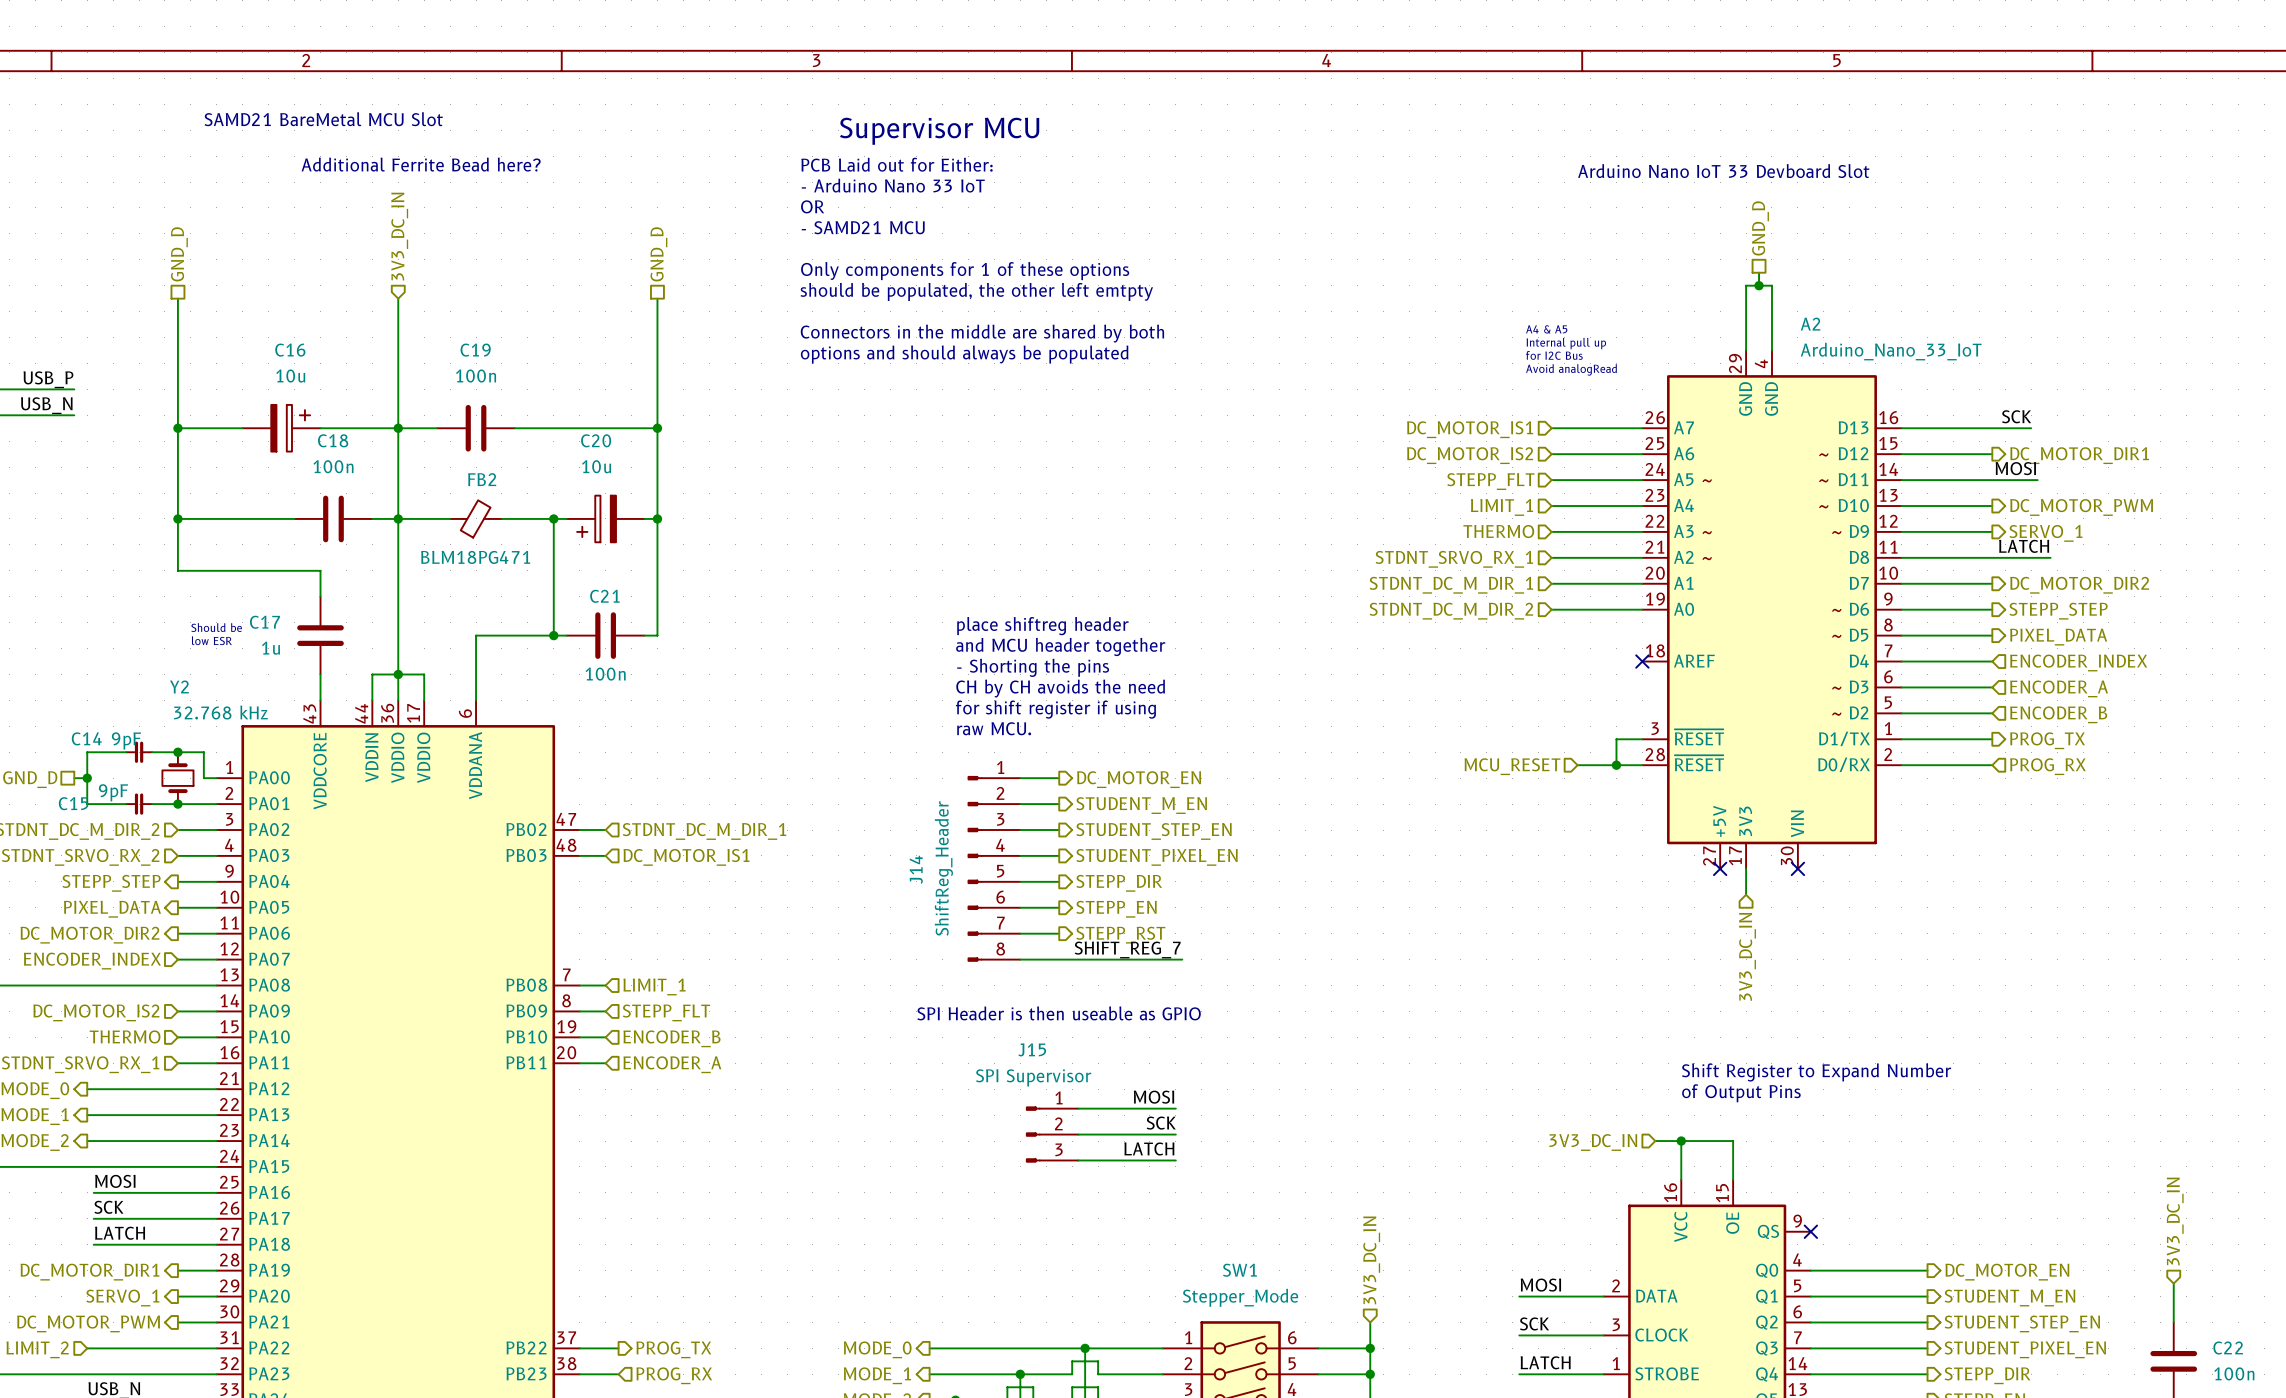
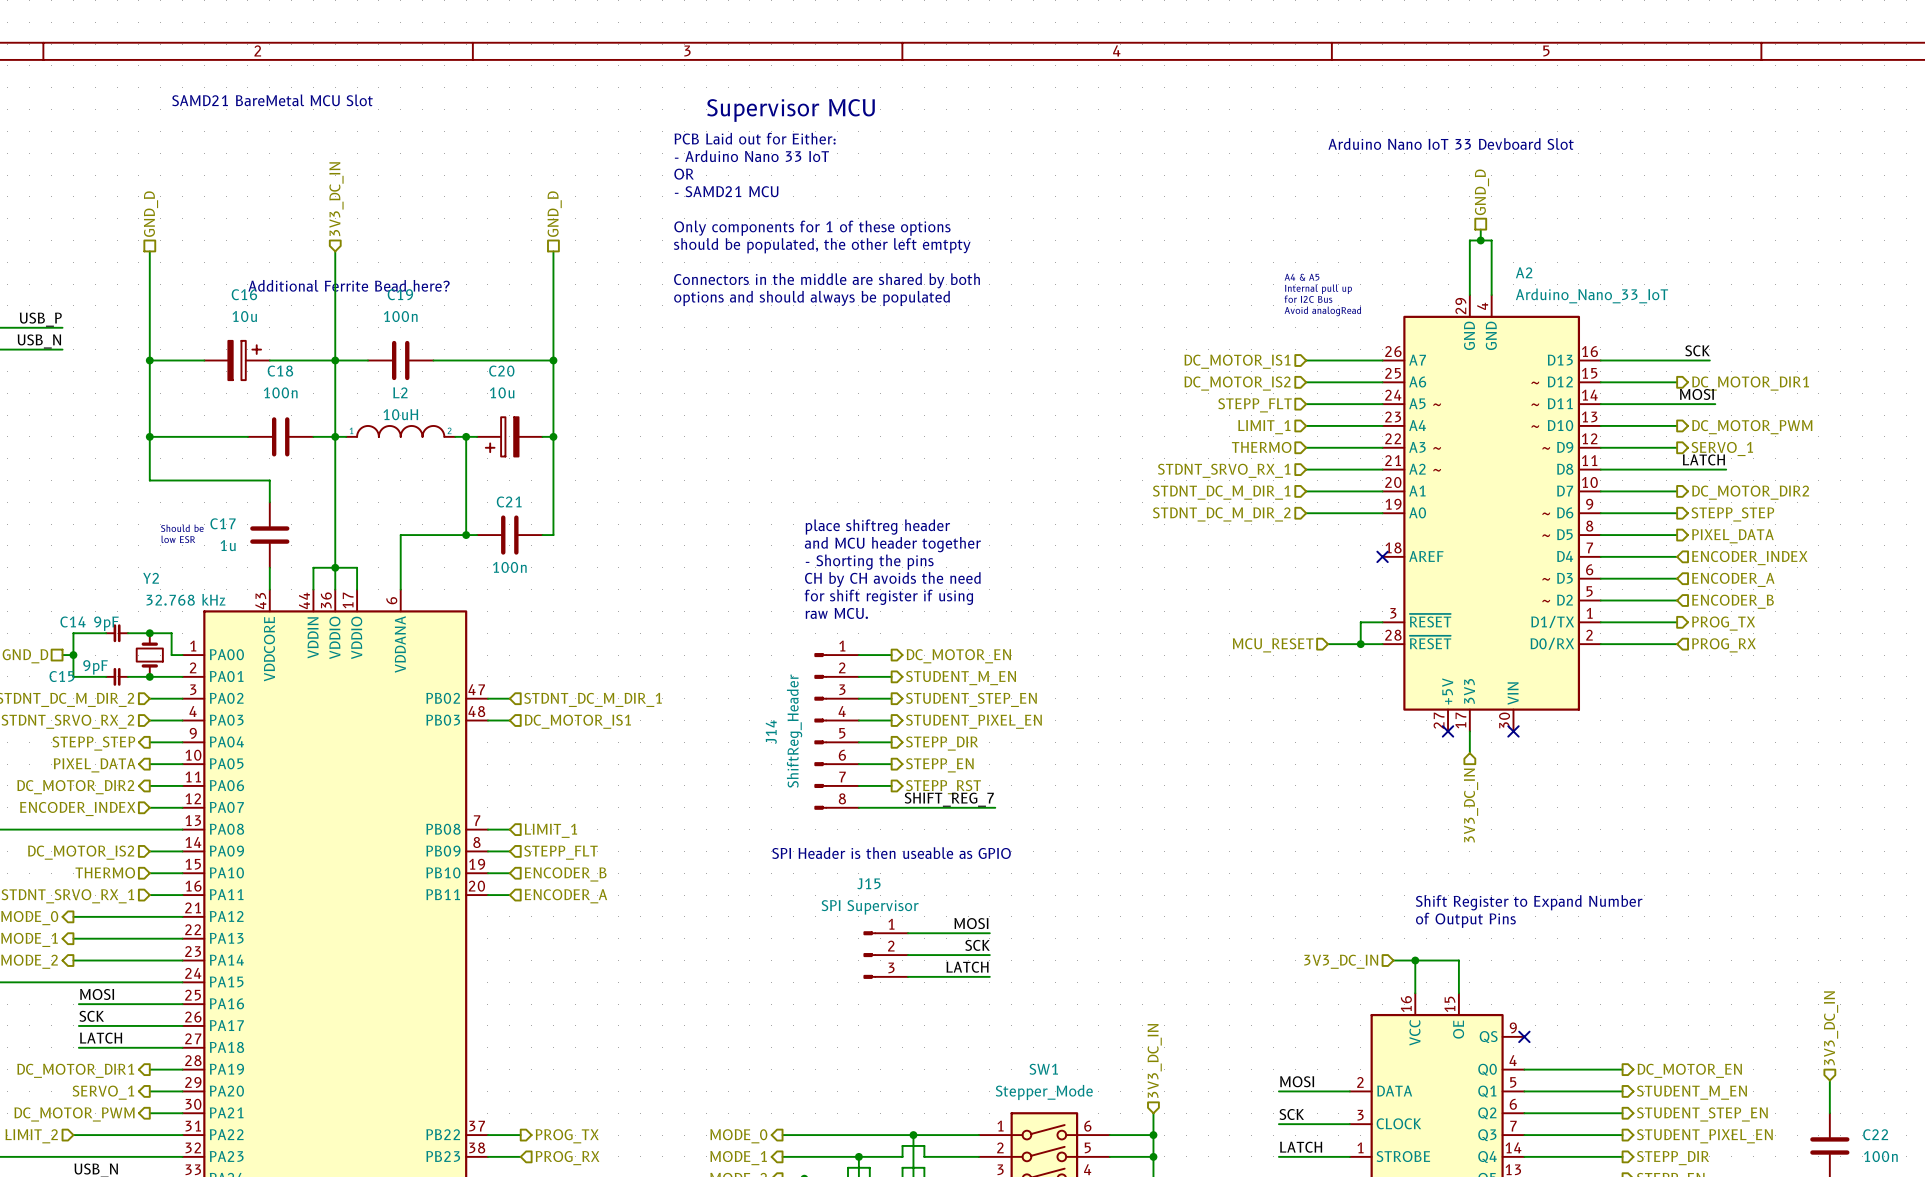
text position: Additional Ferrite Bead here? (421, 164) -> Additional Ferrite Bead here? (349, 285)
L2: none -> 10uH (400, 431)
wire: (411, 518) (450, 518) -> none
FB2: BLM18PG471 (476, 518) -> none
wire: (501, 518) (540, 518) -> none

